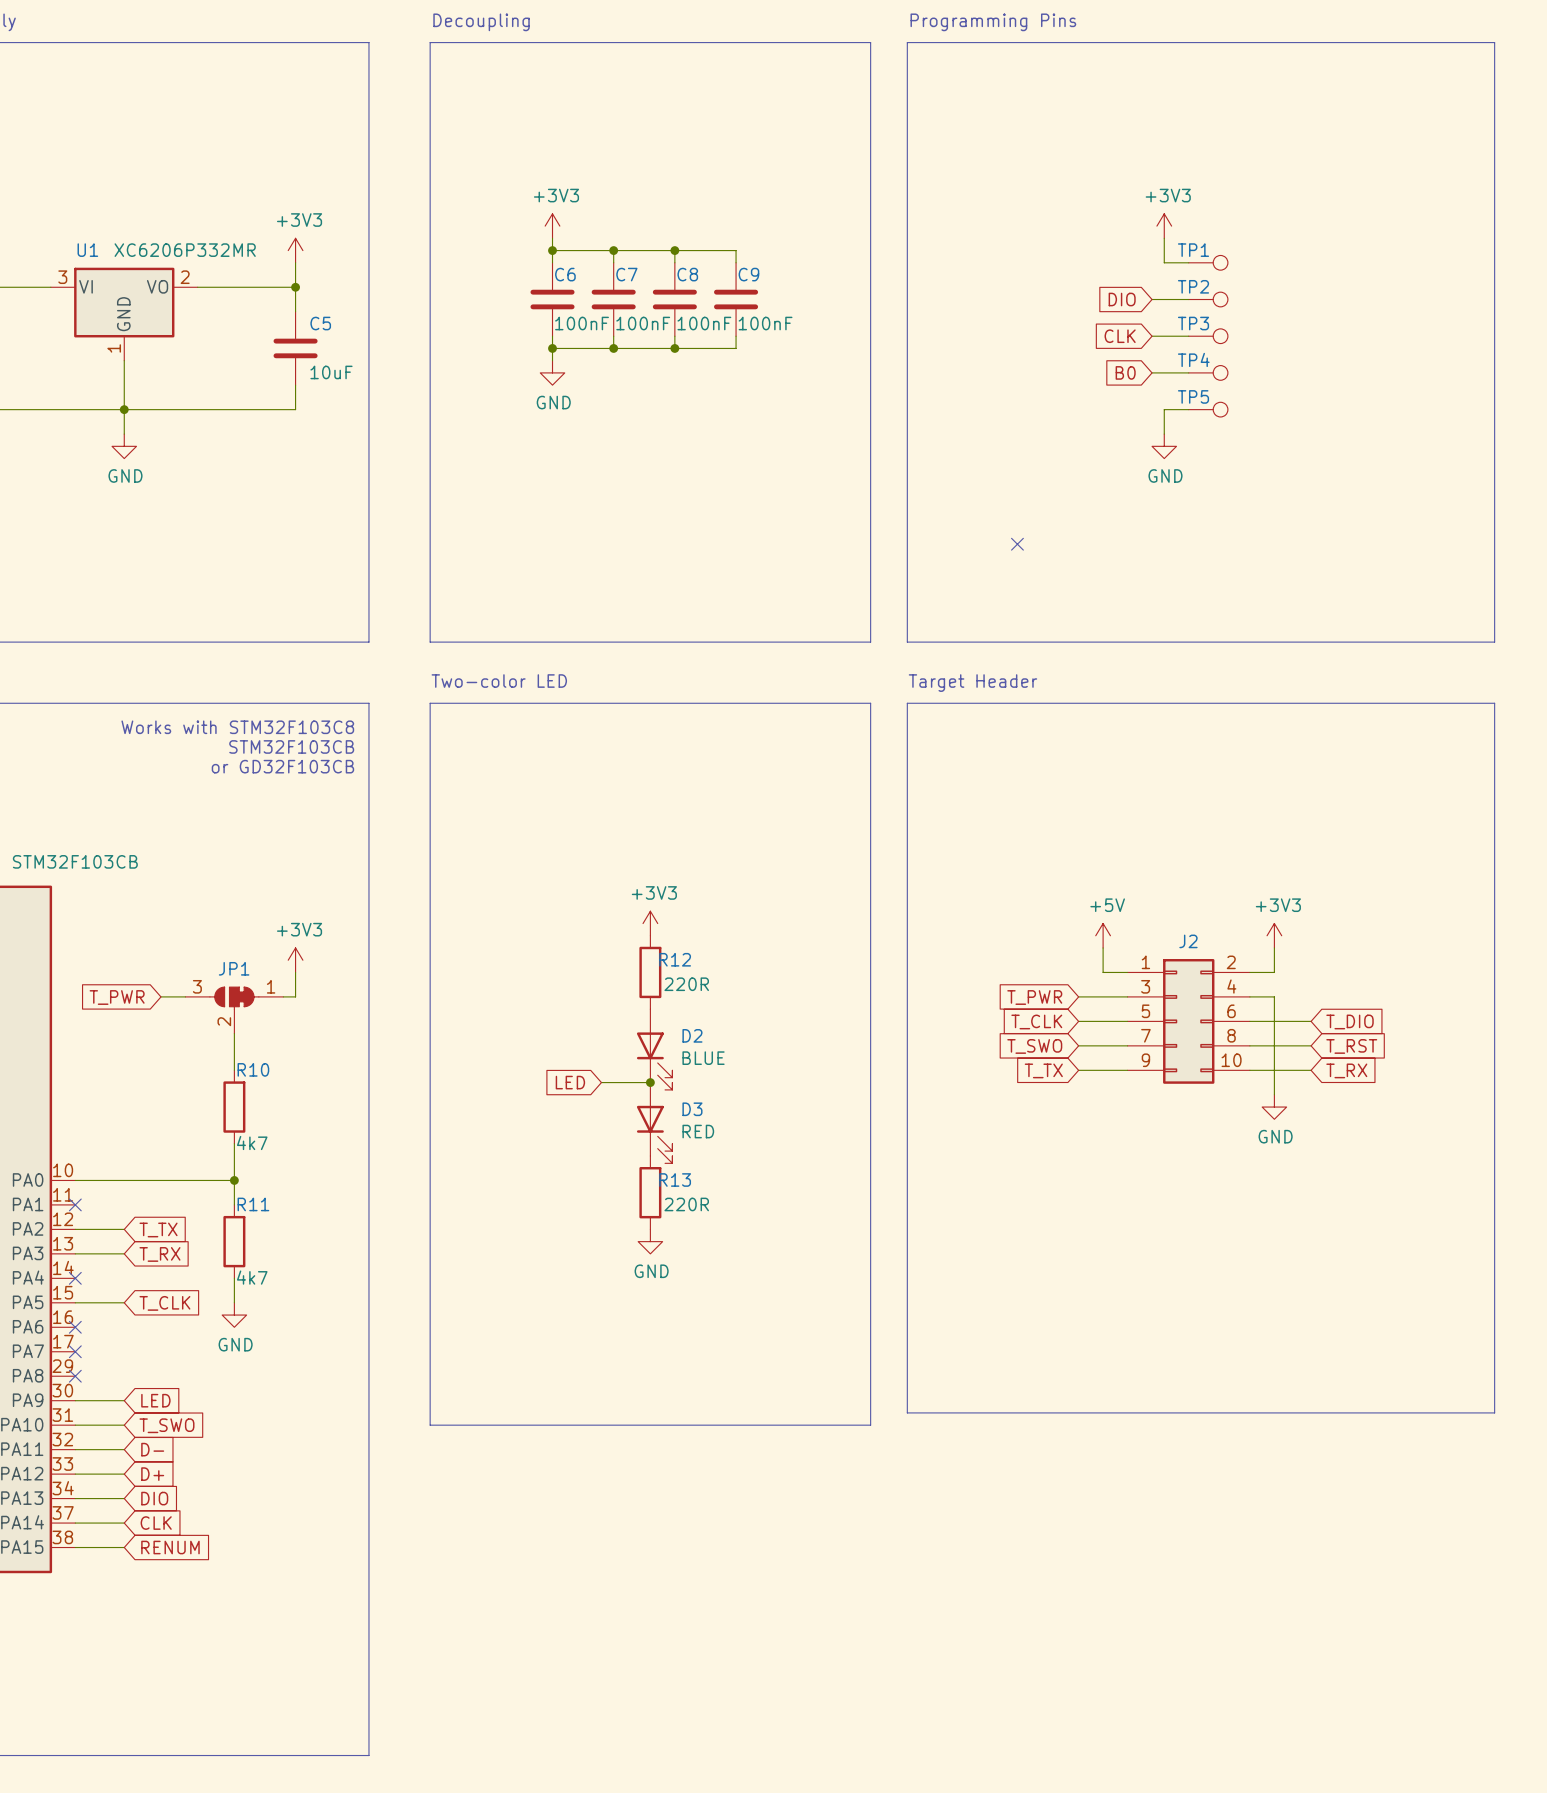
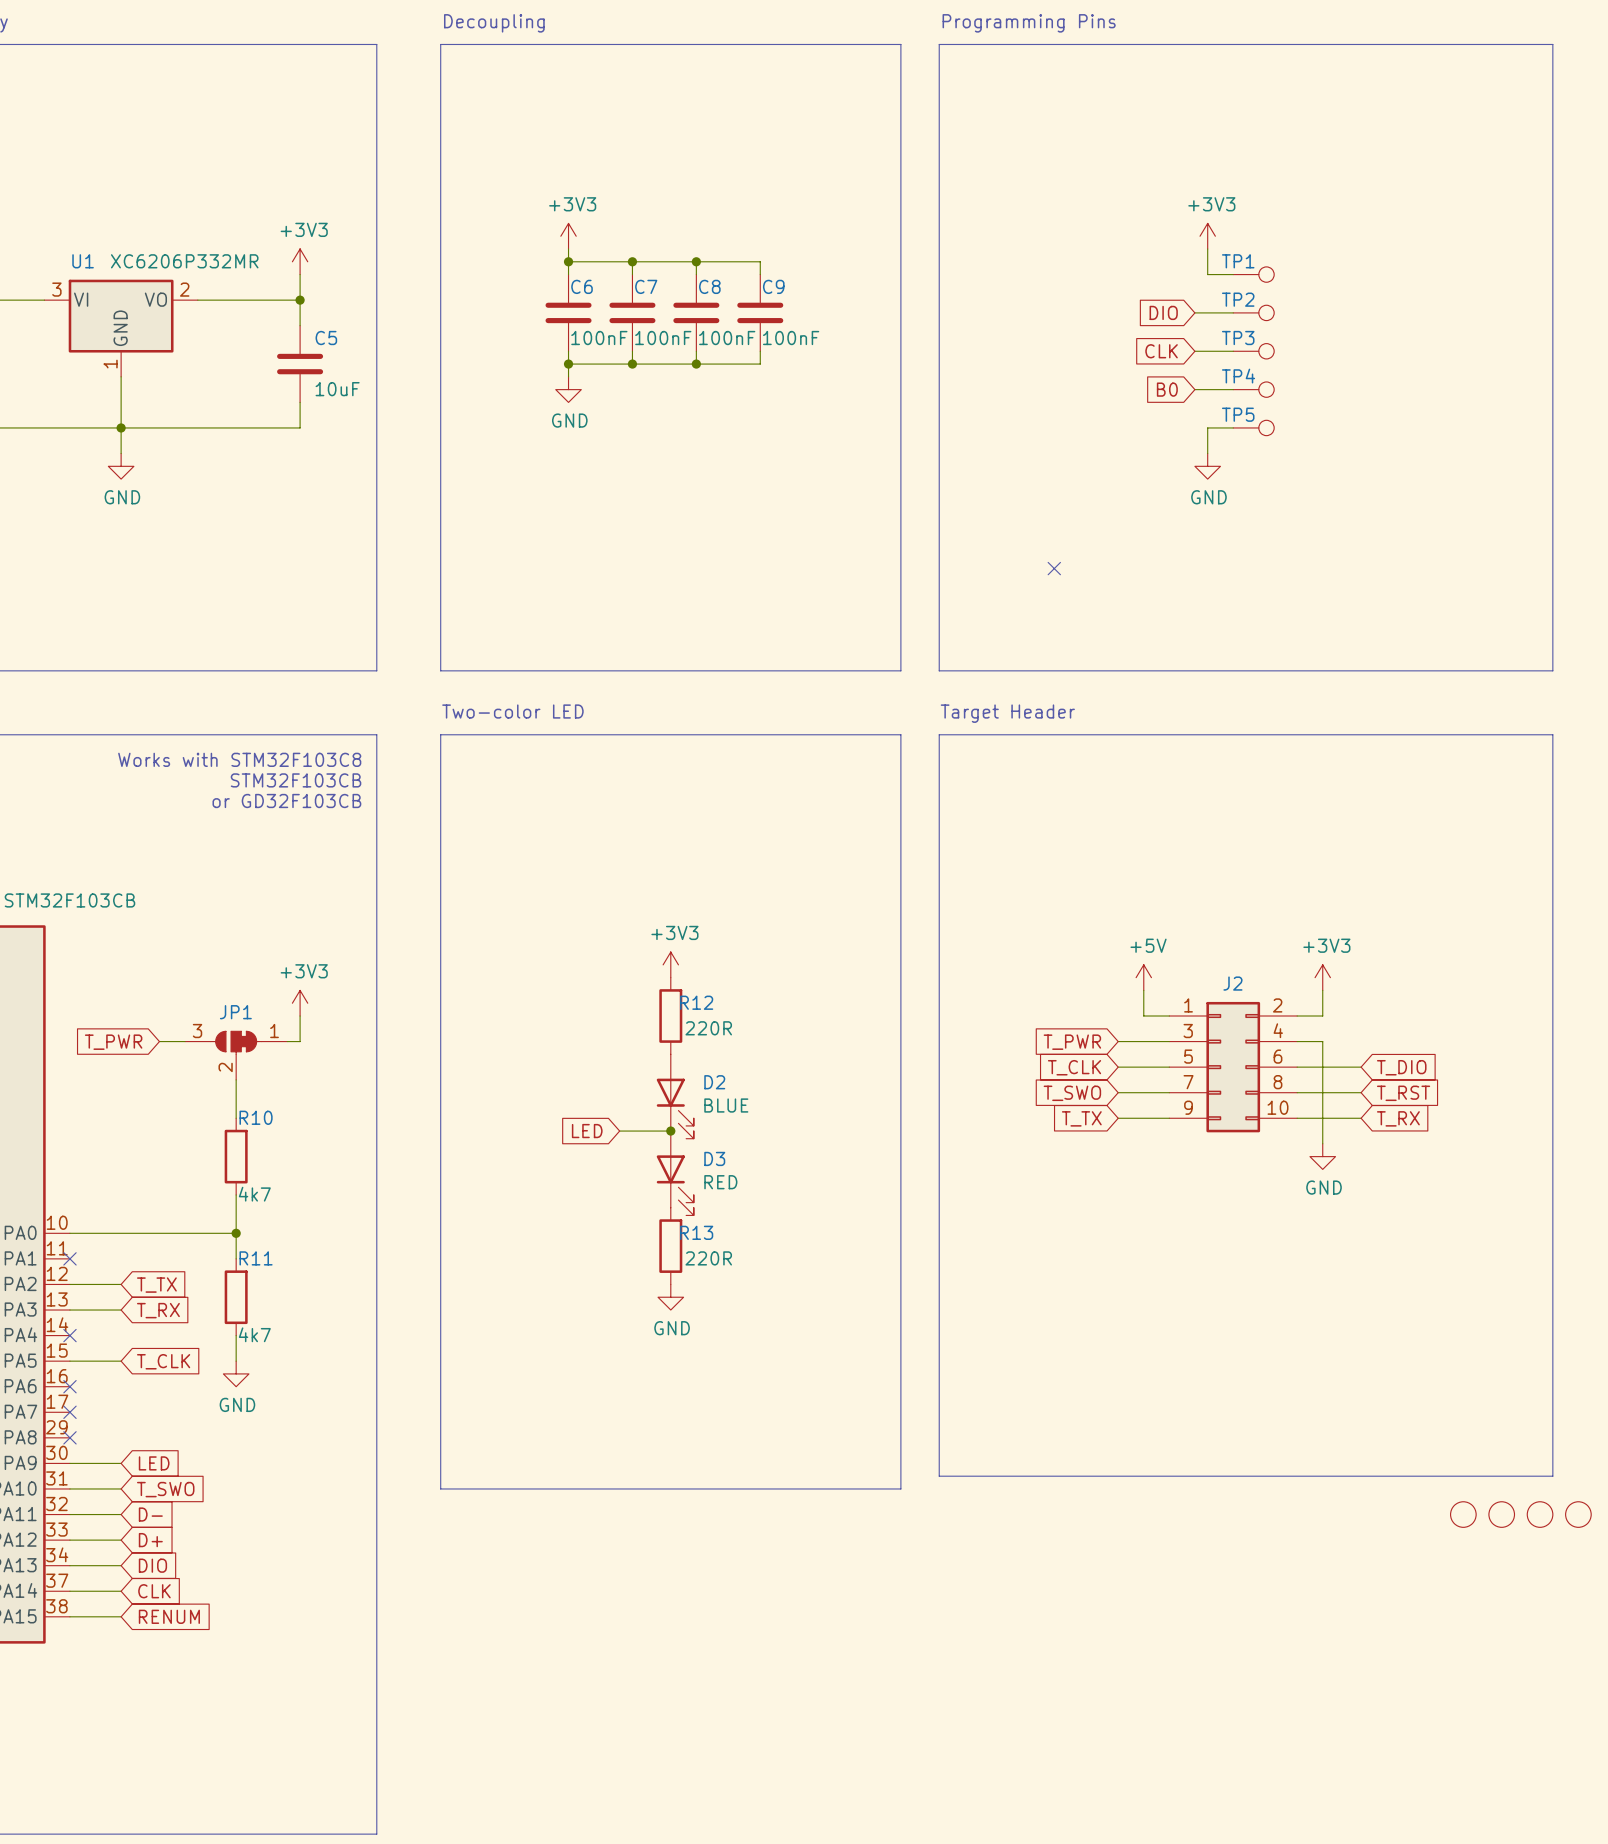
part: none -> (1463, 1514)
part: none -> (1501, 1514)
part: none -> (1540, 1514)
part: none -> (1578, 1514)

